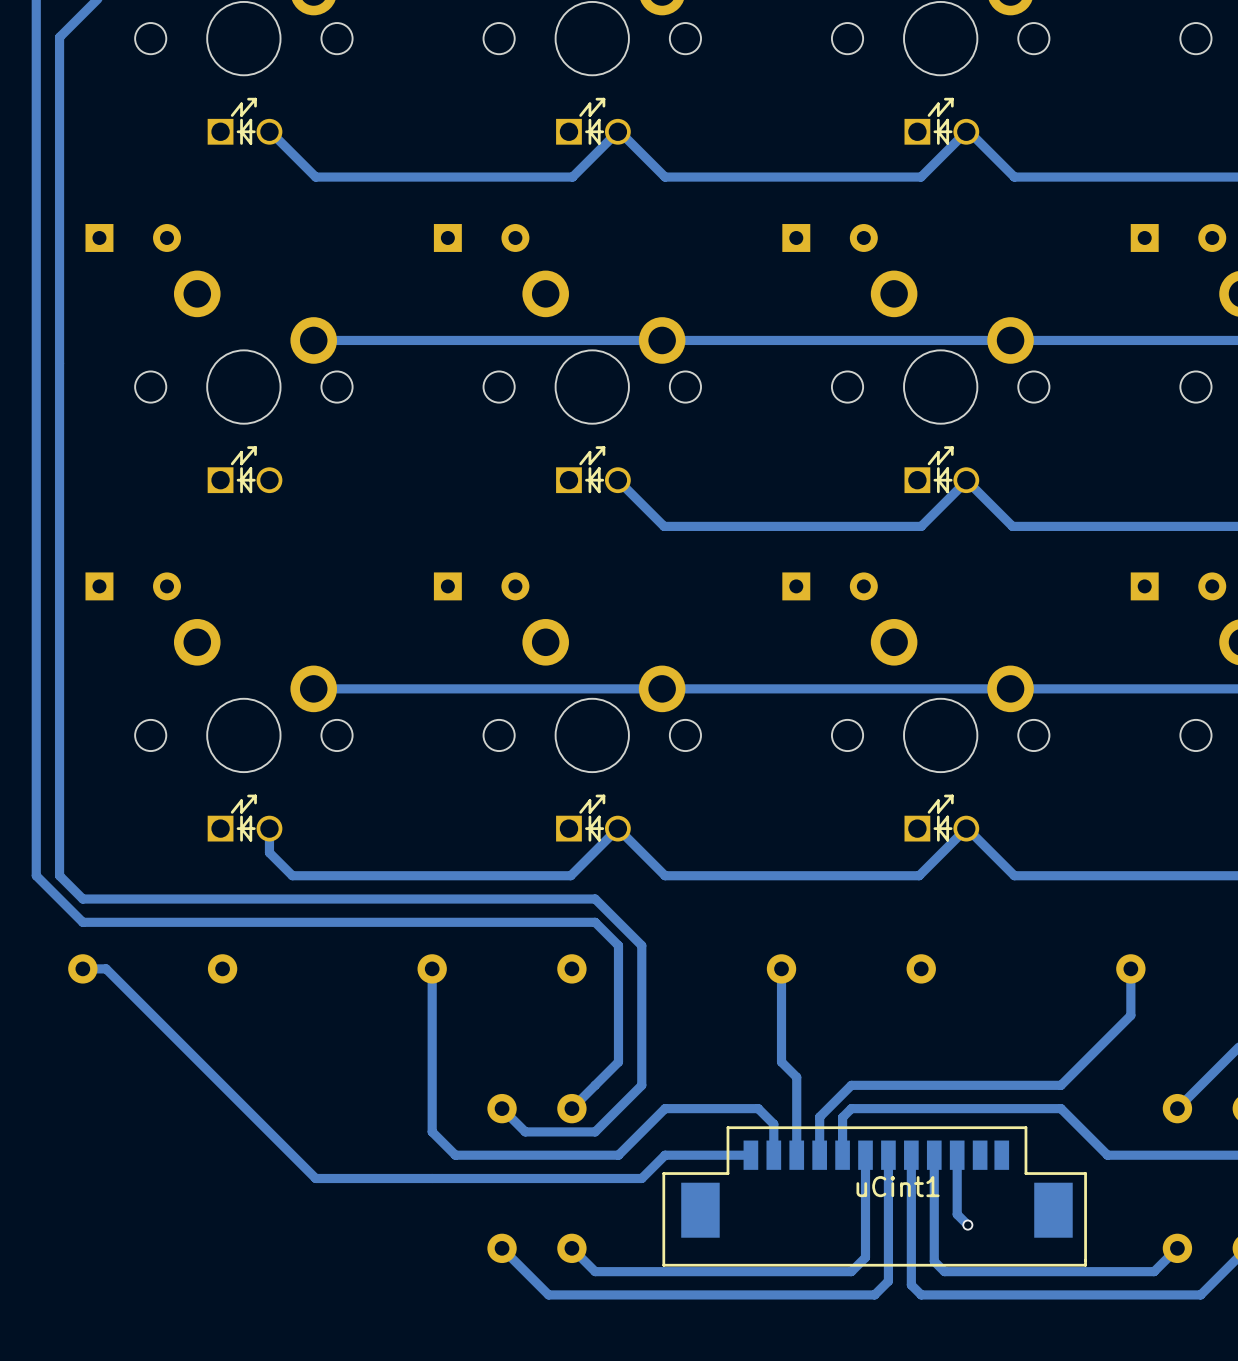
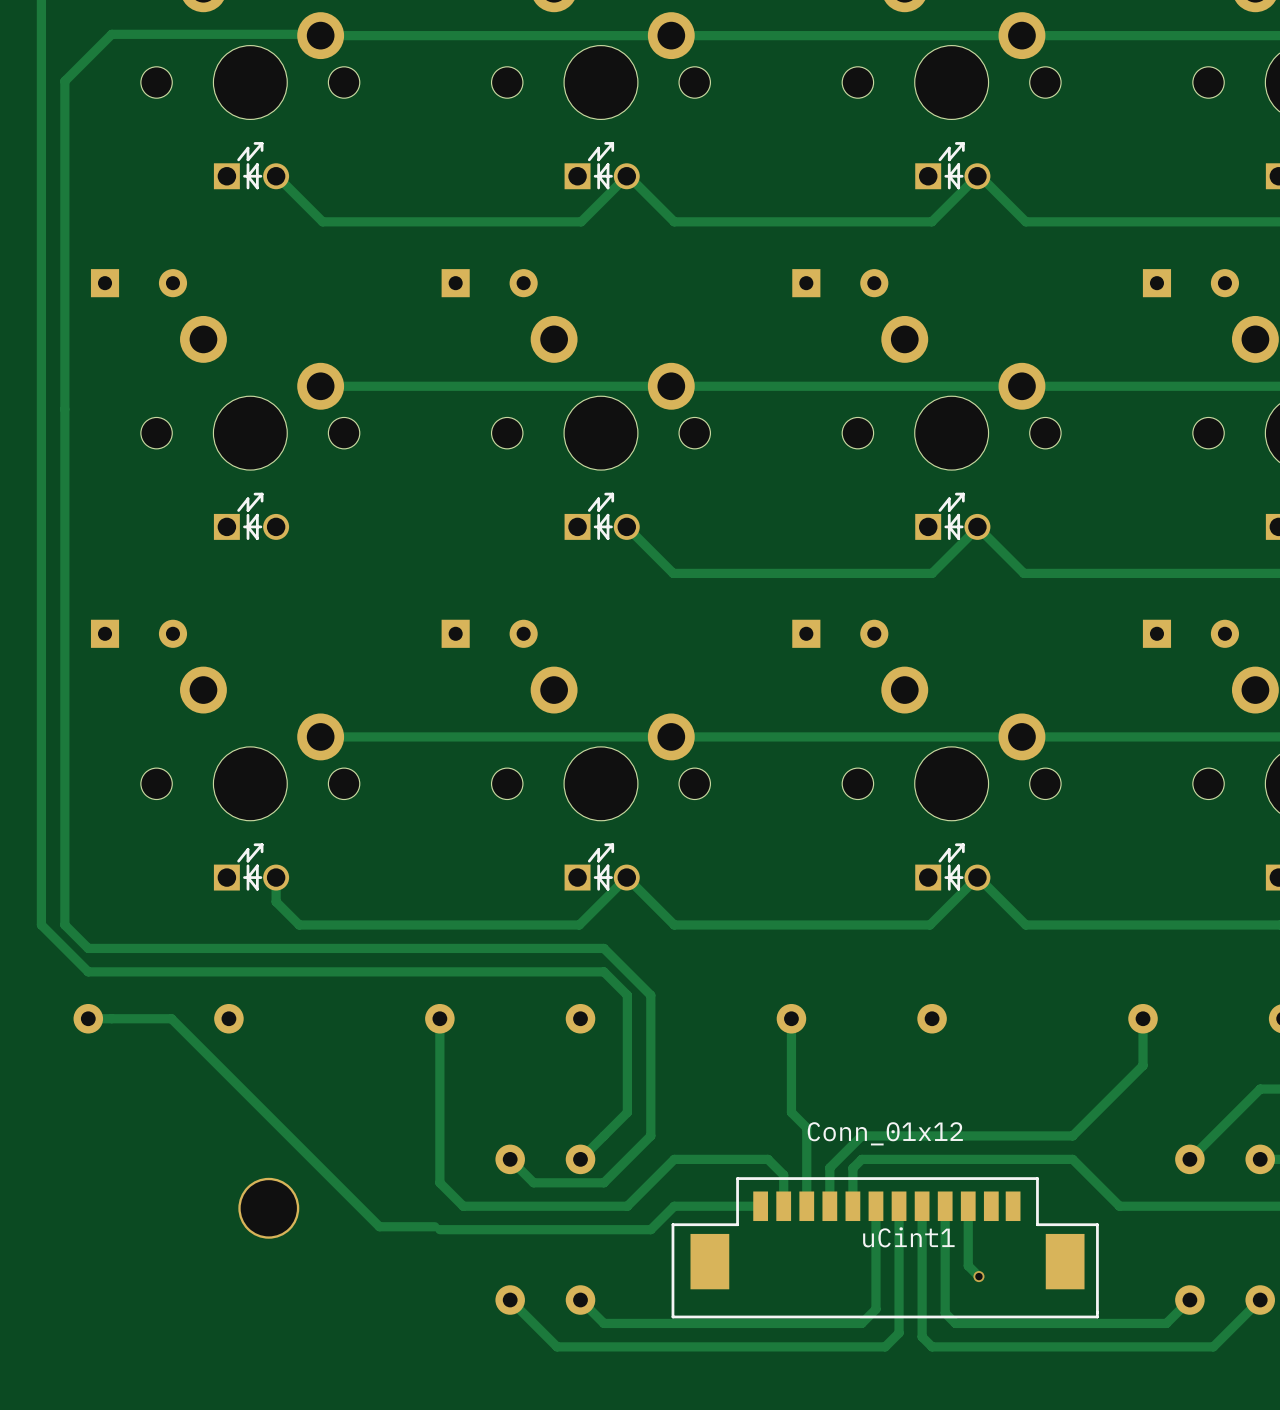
track: (106, 968) (315, 1178) (432, 1178) -> (111, 1018) (171, 1018) (379, 1226) (434, 1226)
uCint1 value: none -> Conn_01x12 (885, 1133)
part: none -> (268, 1208)

